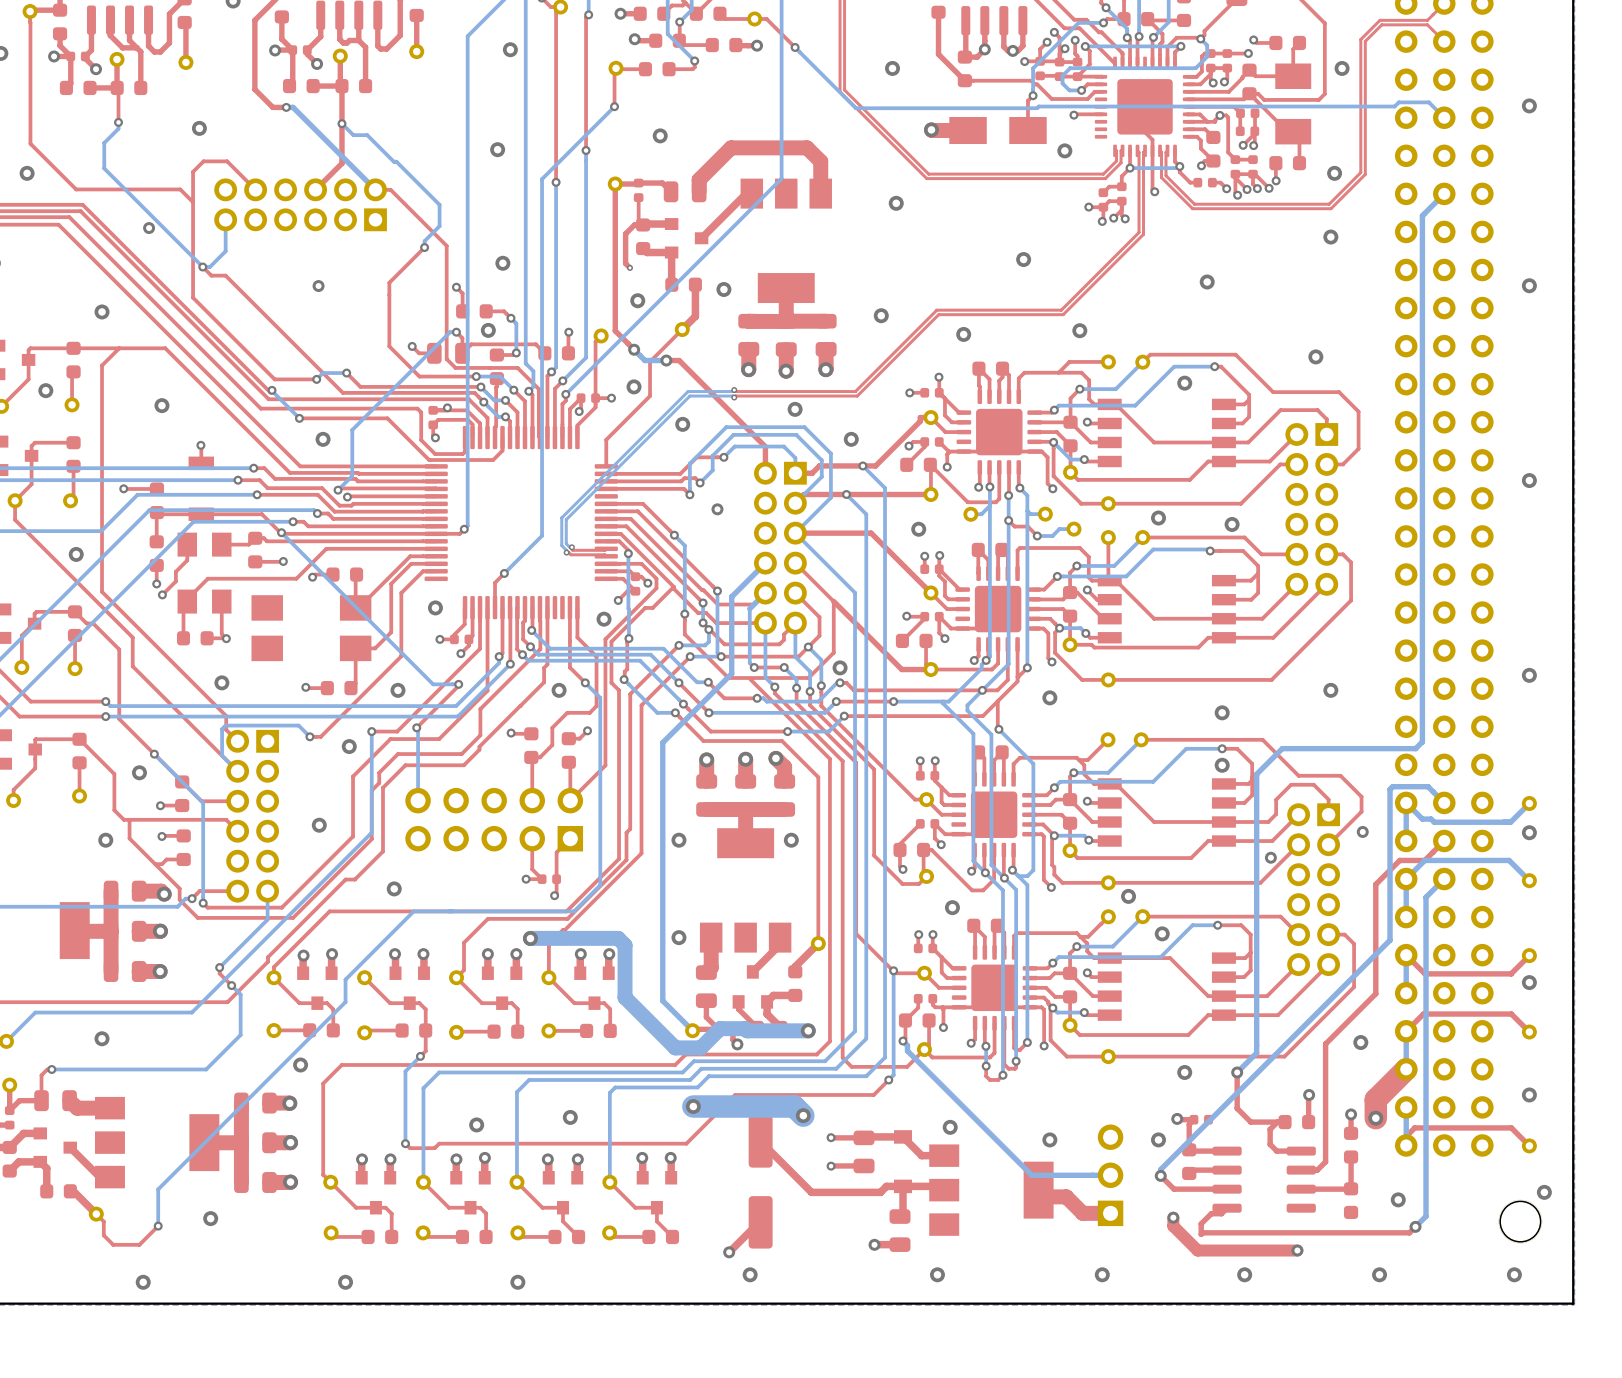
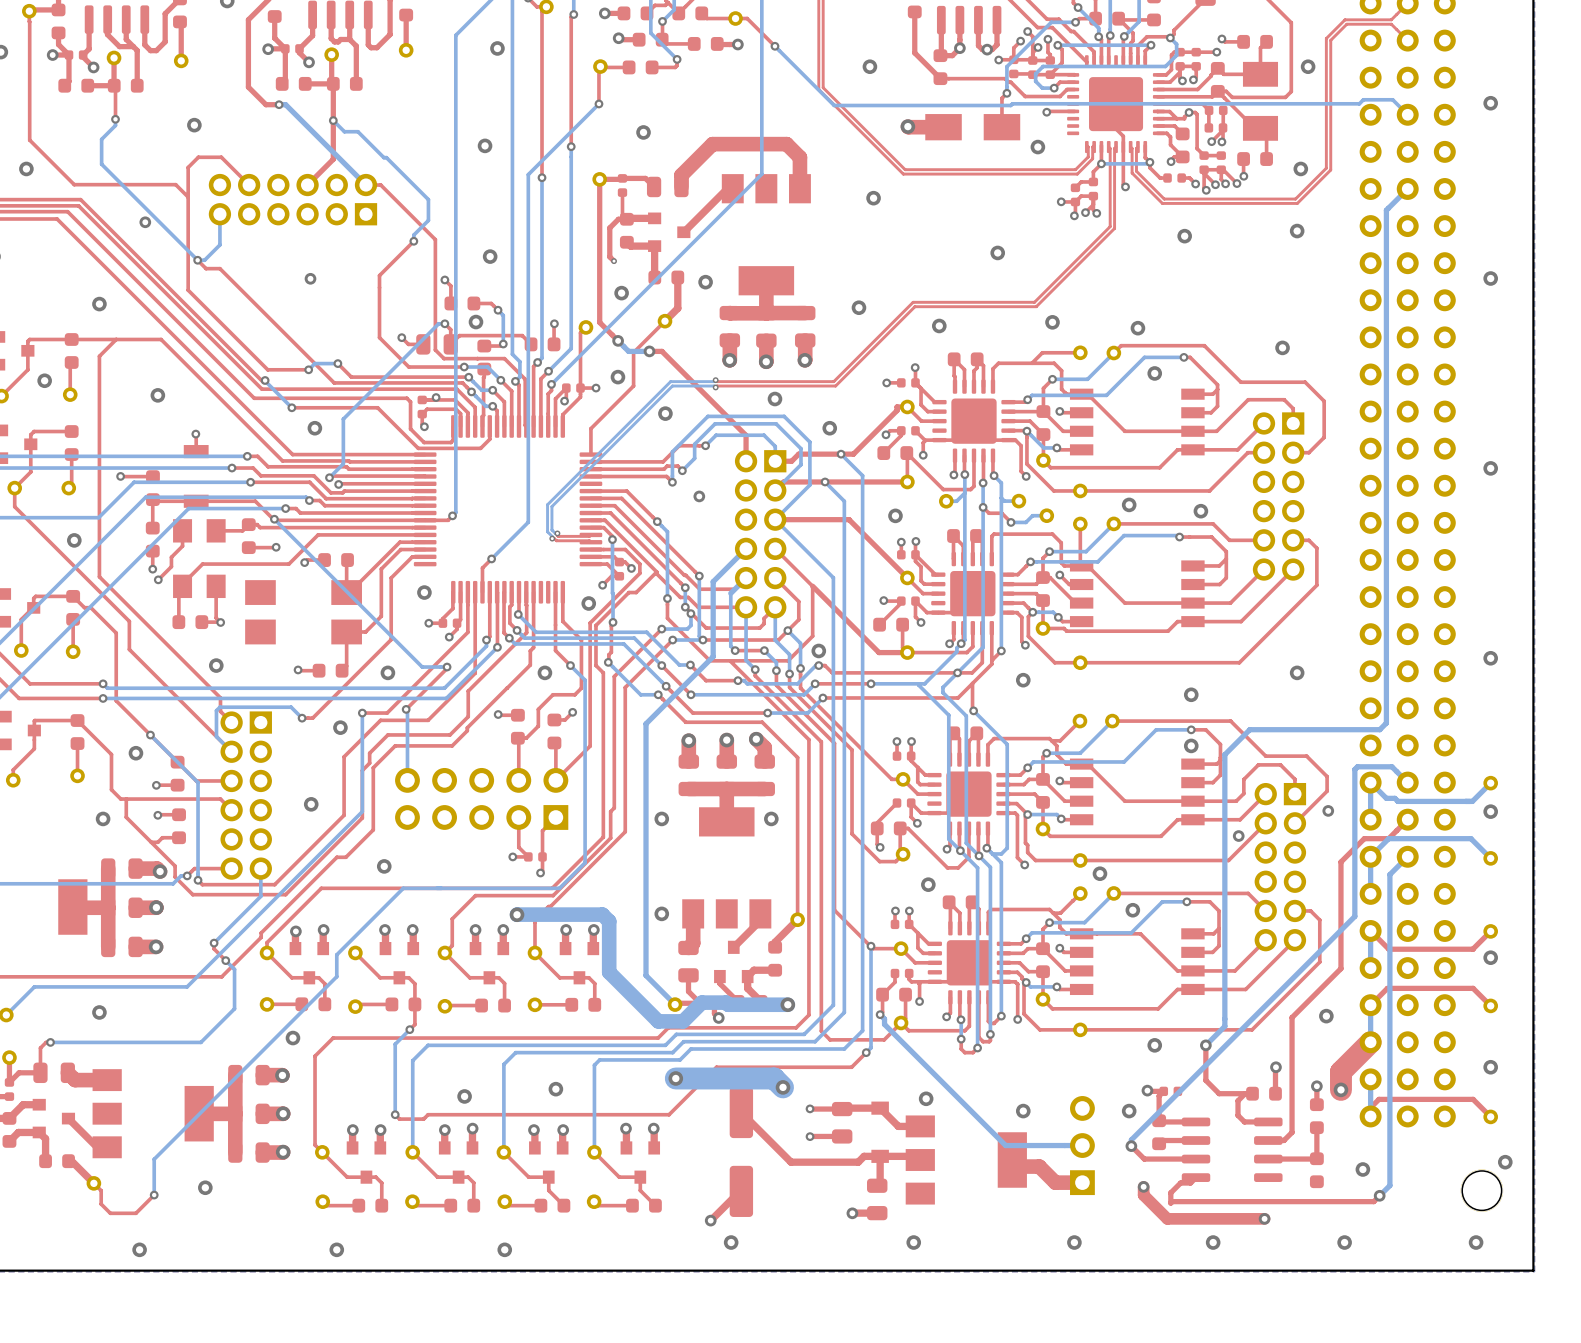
via: none -> (1184, 236)
via: (1207, 281) -> none
via: none -> (1137, 328)

